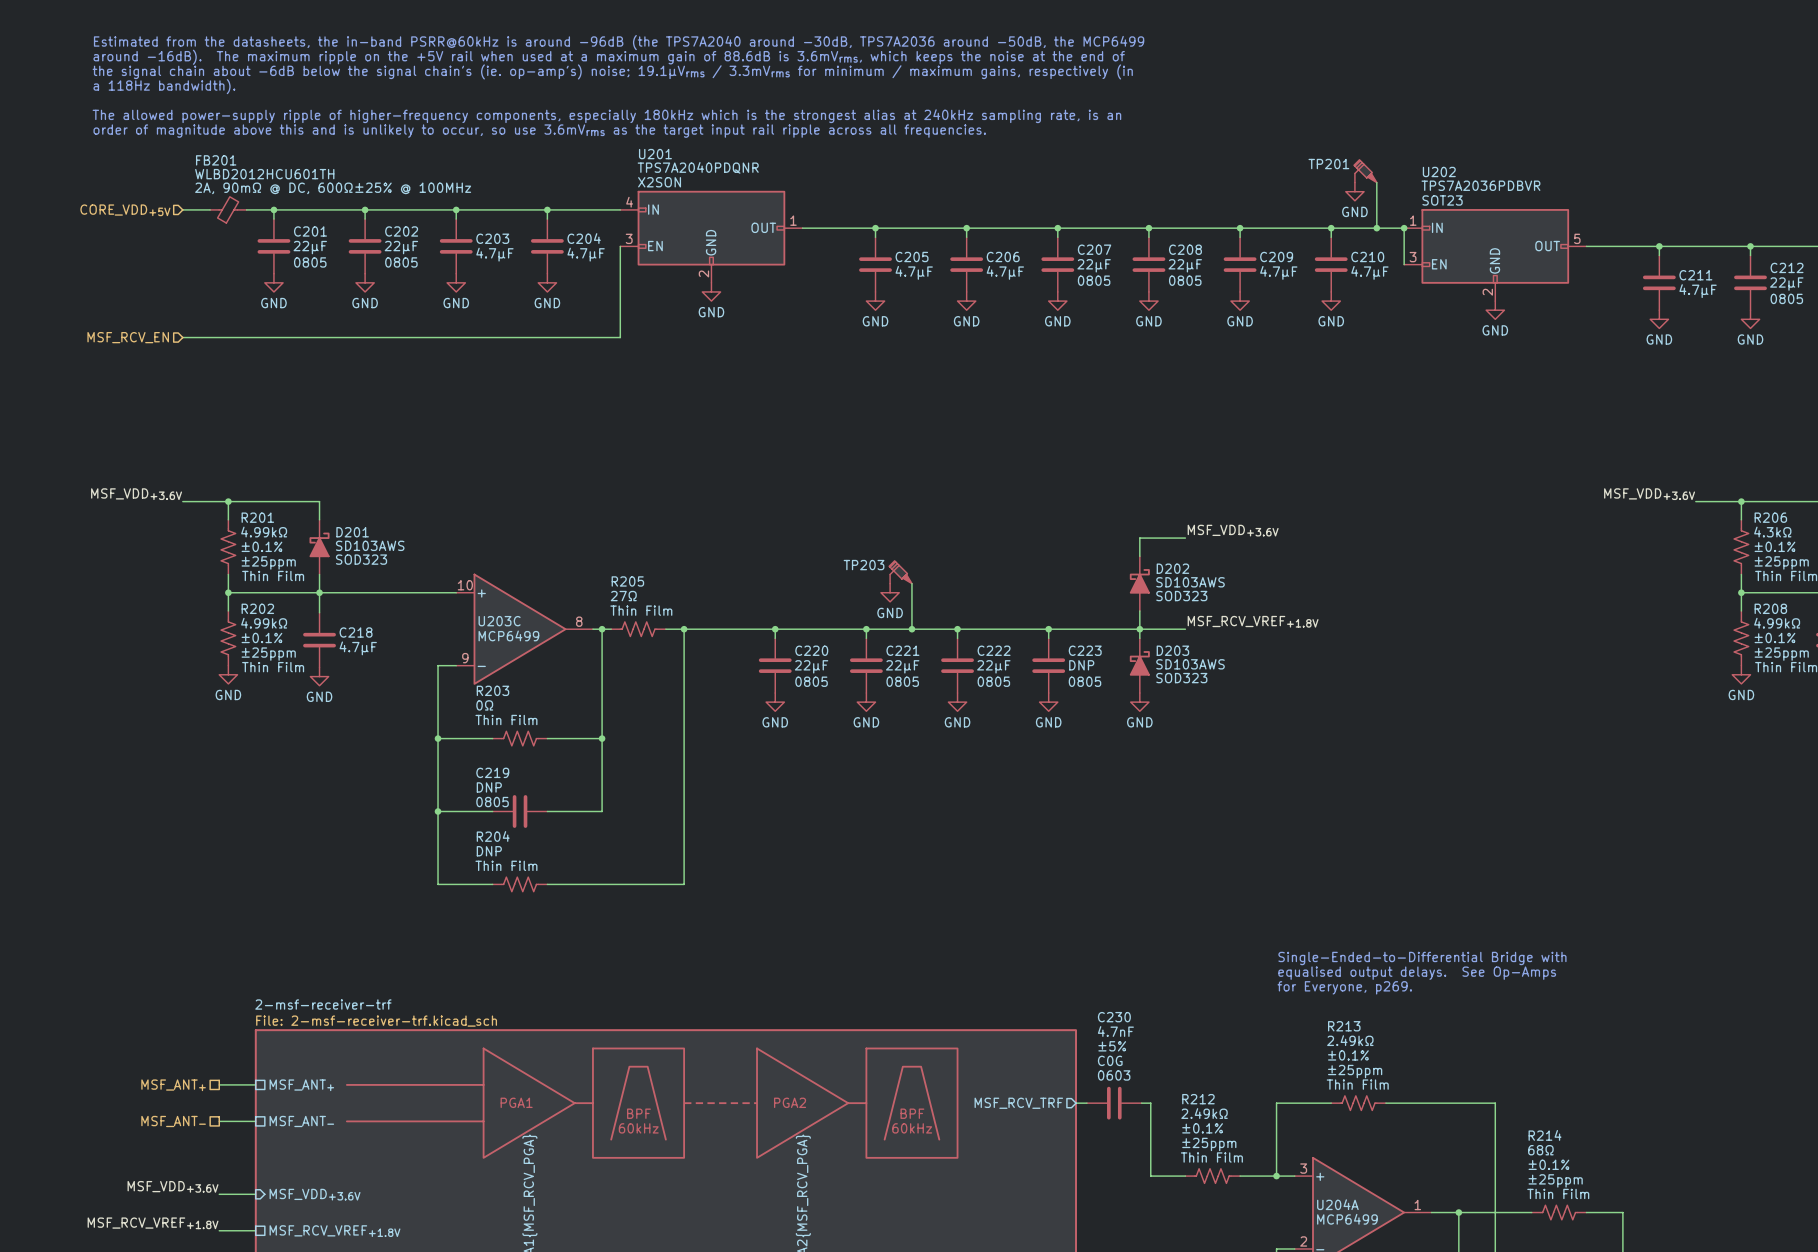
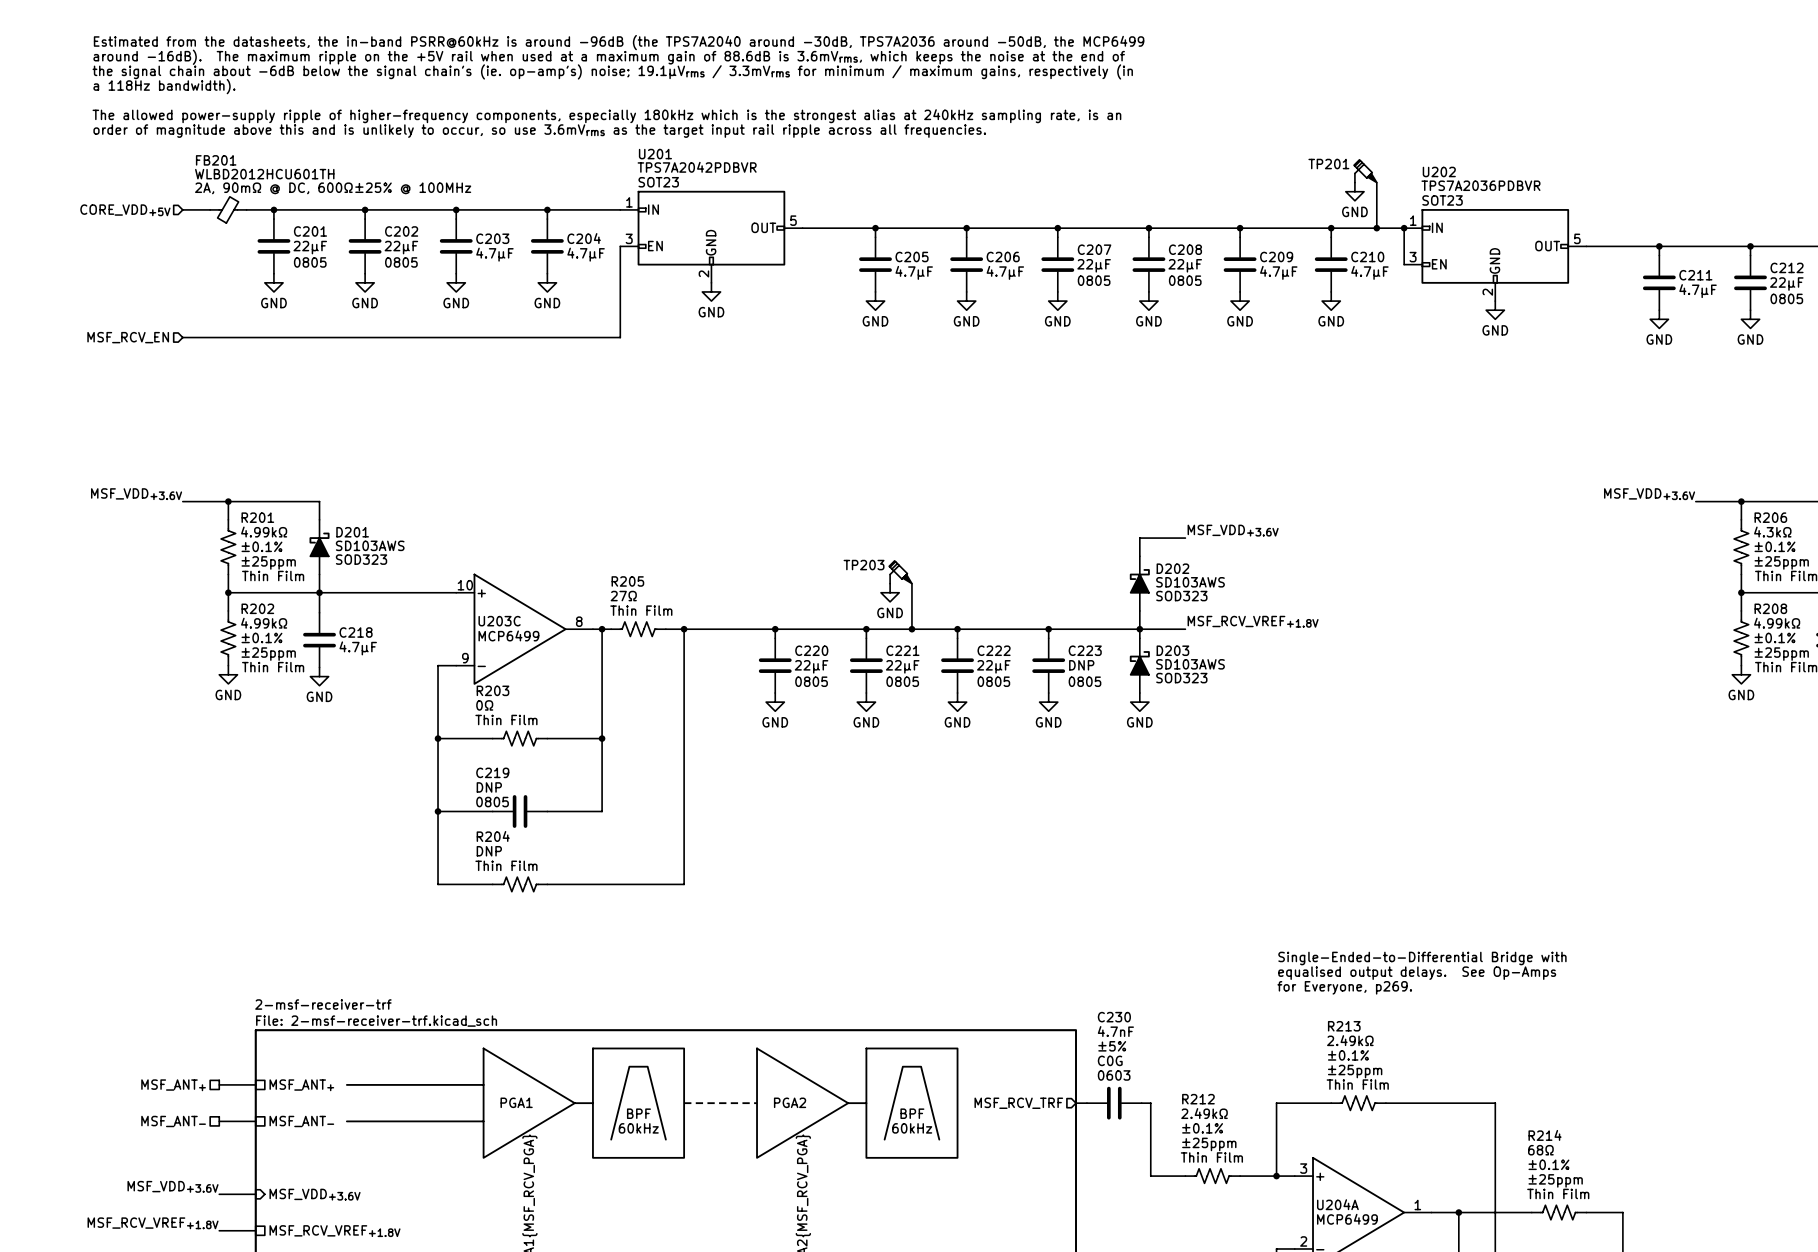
U201 value: TPS7A2040PDQNR (698, 167) -> TPS7A2042PDBVR (697, 167)
U201 text: X2SON (659, 182) -> SOT23 (658, 182)
U201 pin number: 4 (629, 202) -> 1 (629, 202)
U201 pin number: 1 (793, 220) -> 5 (793, 220)

